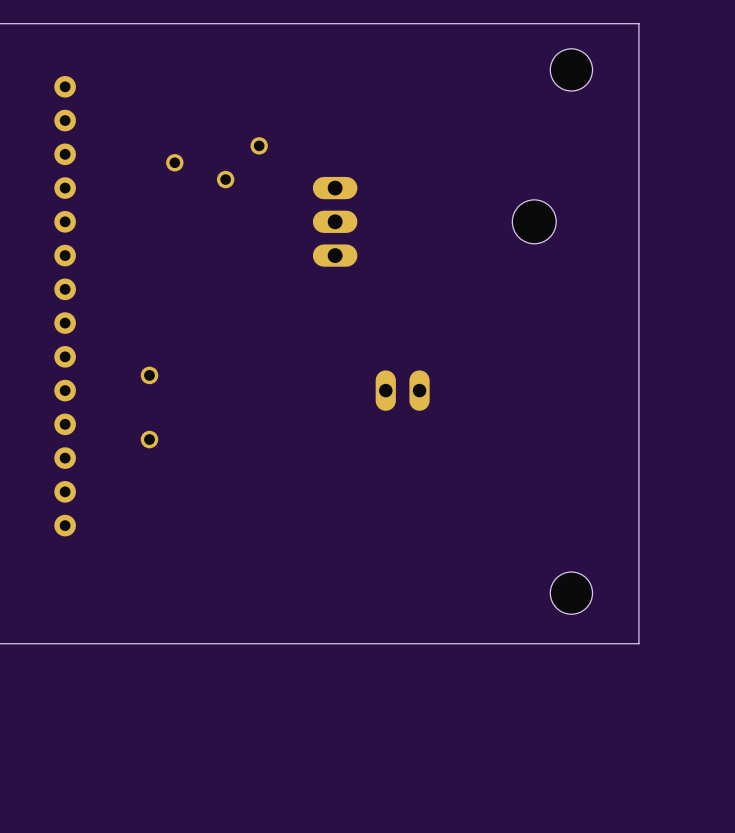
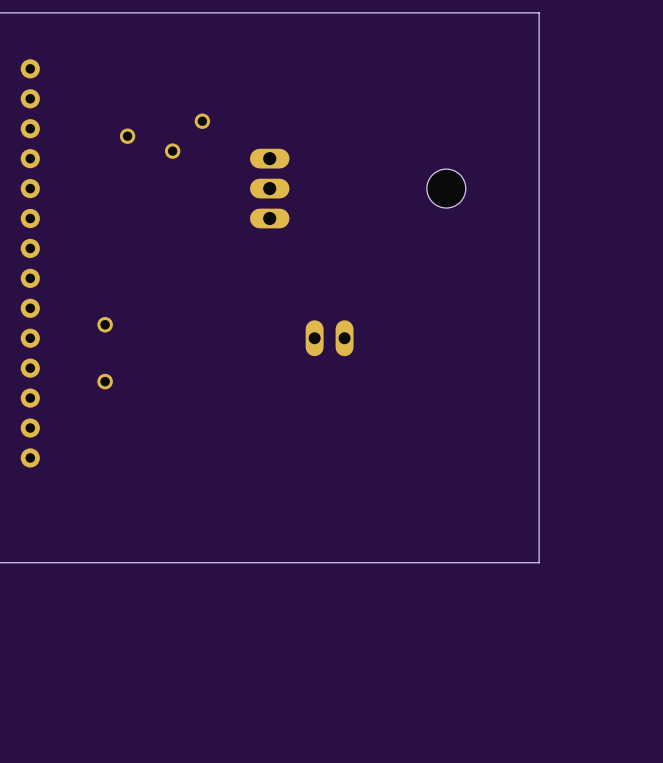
hole: (571, 69) -> none
hole: (571, 593) -> none

